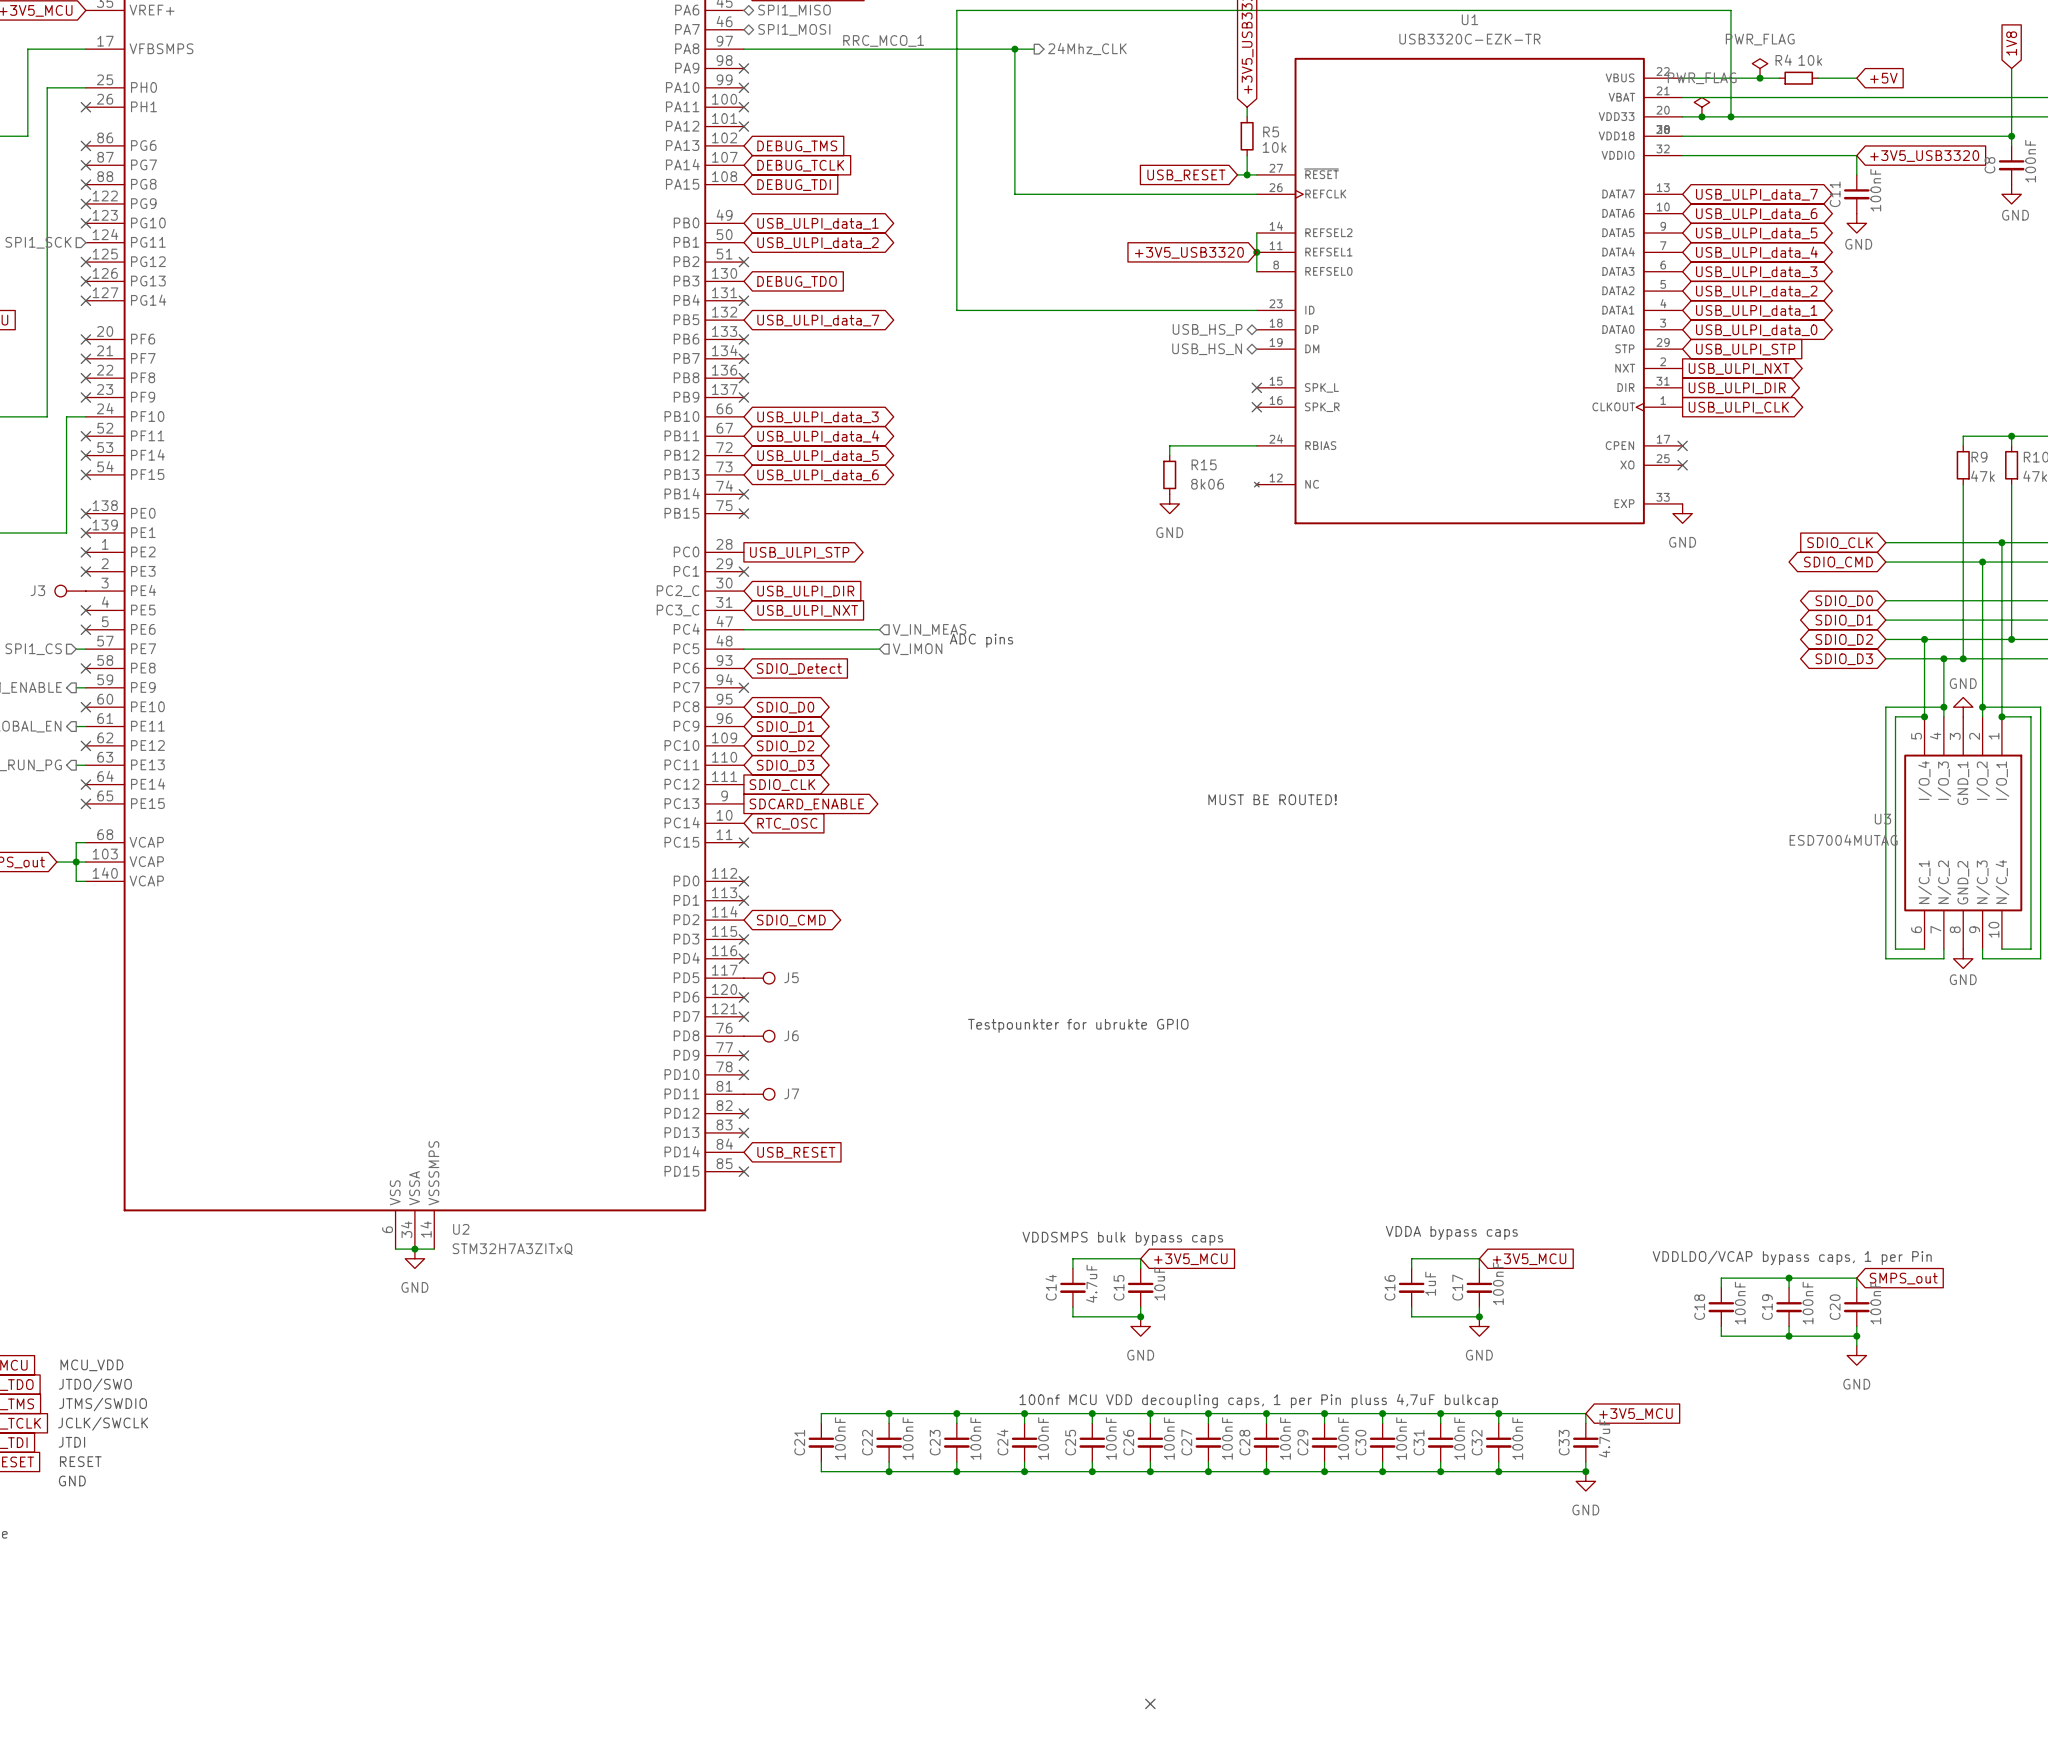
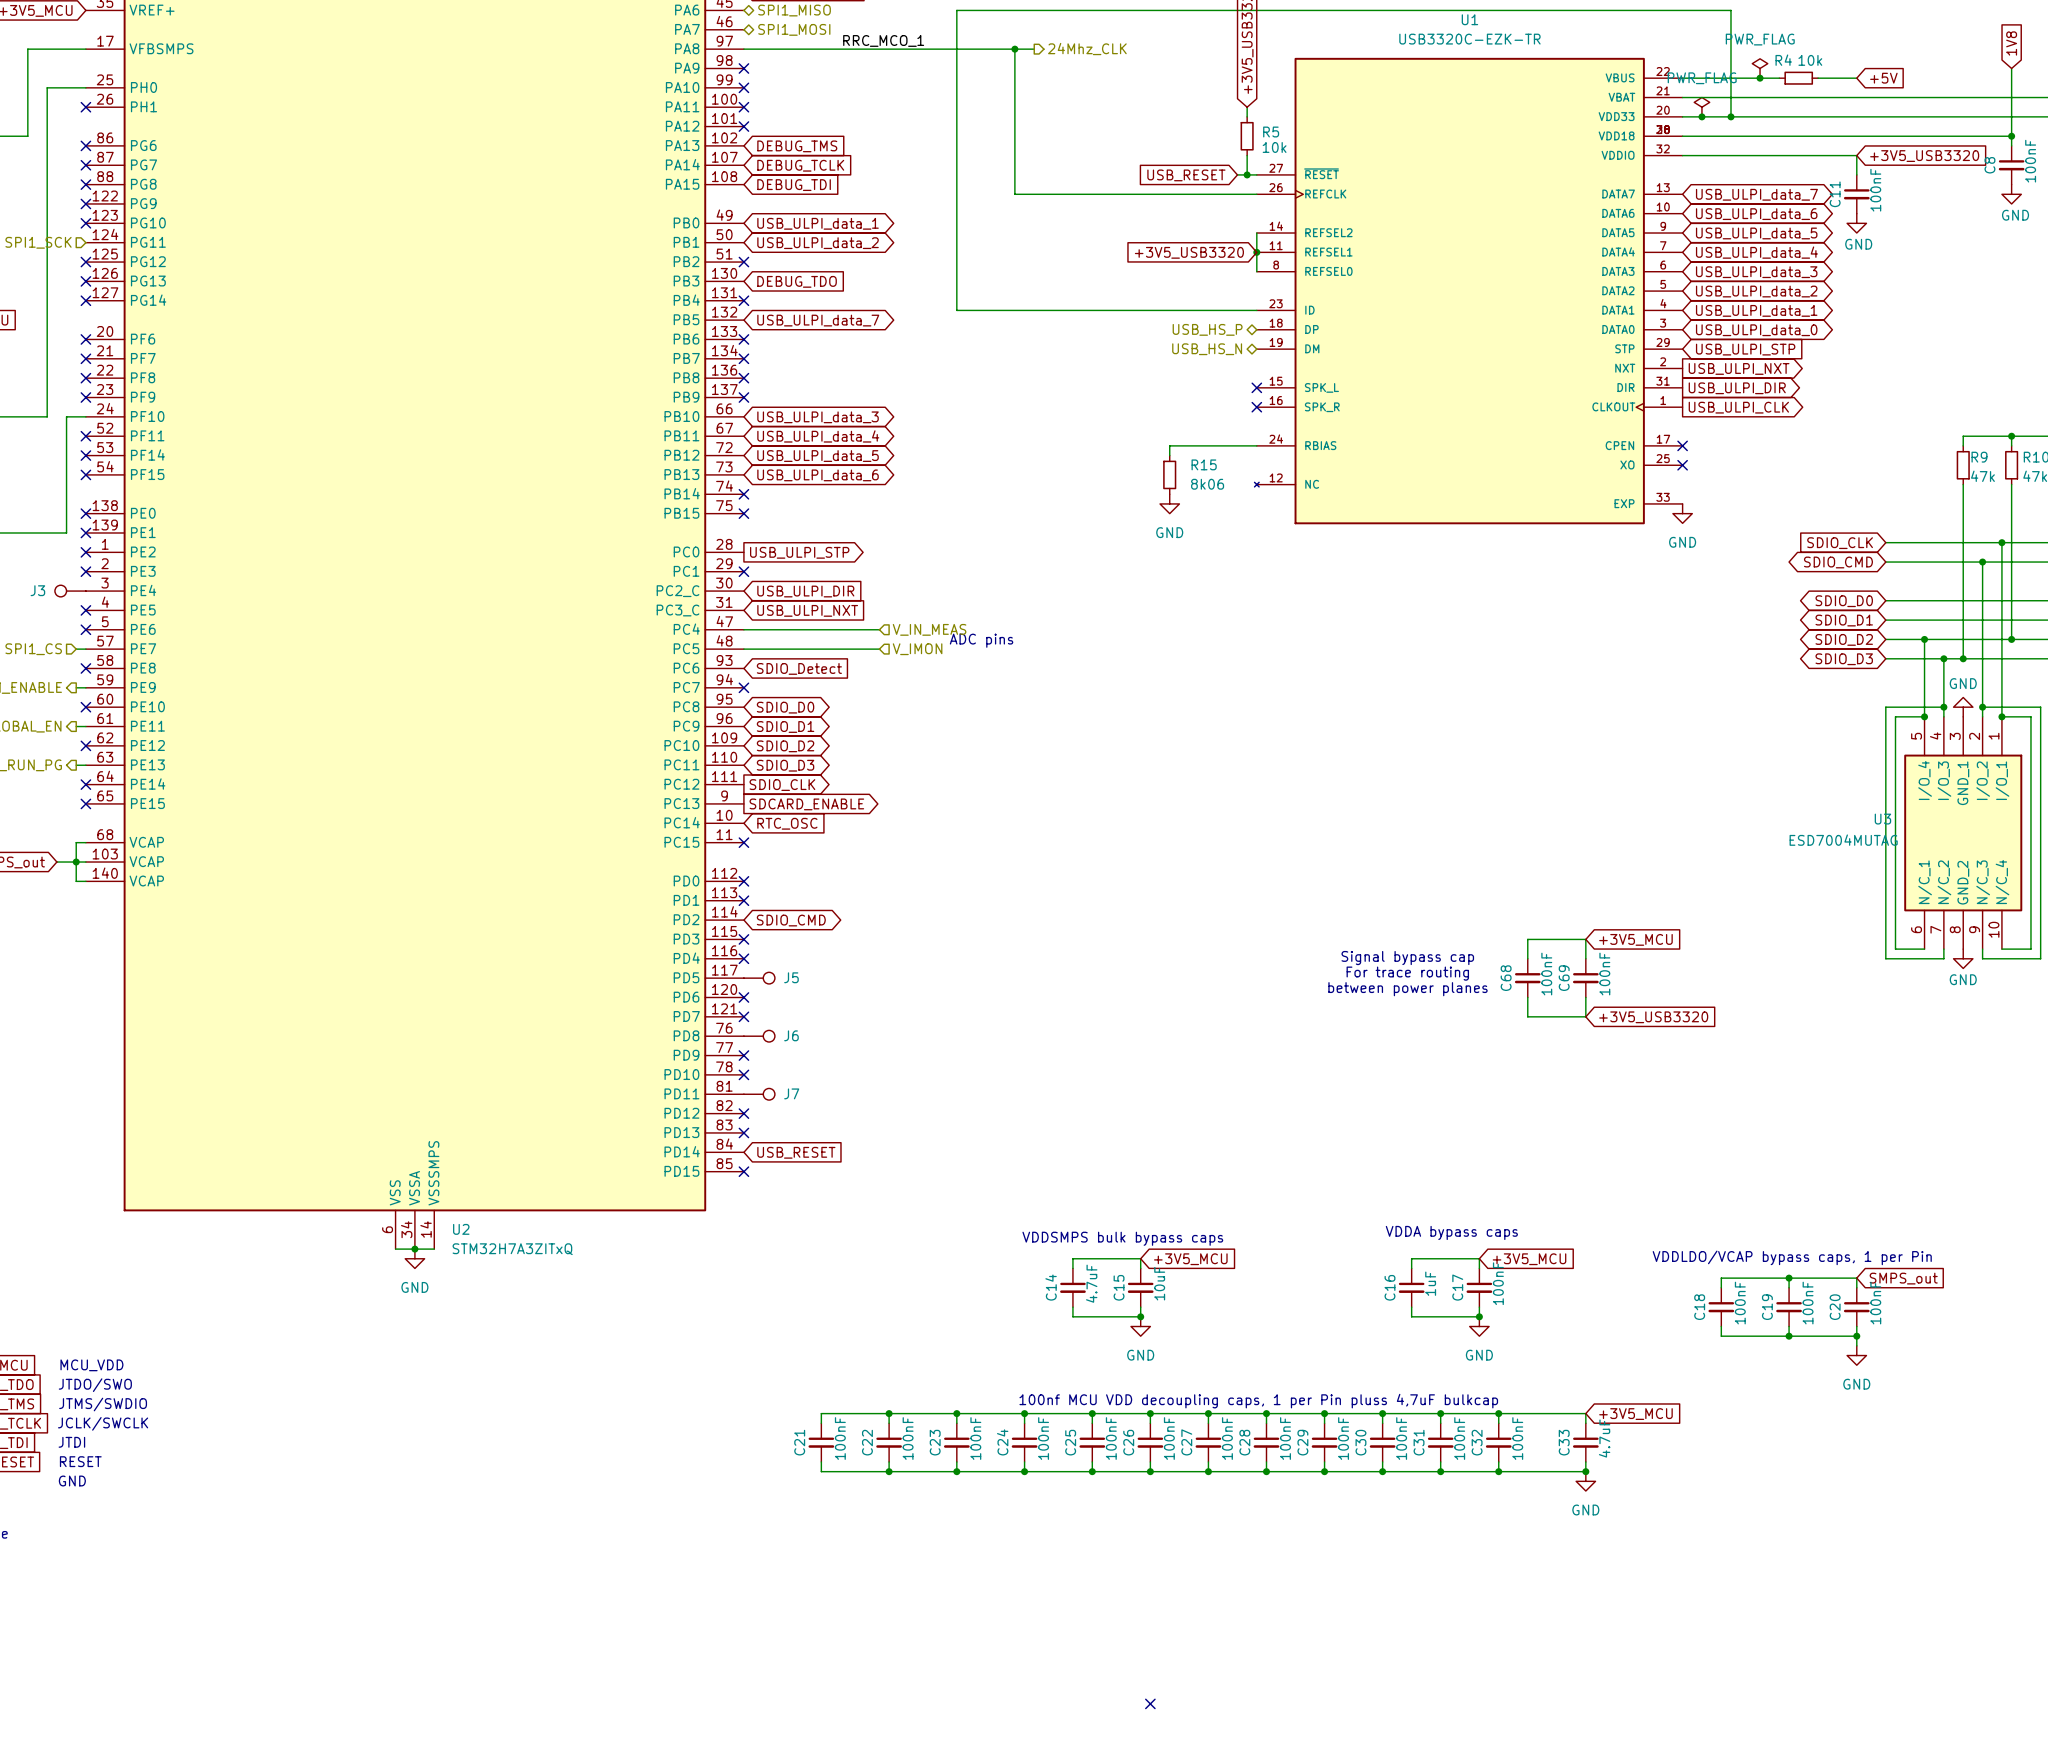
text: MUST BE ROUTED! (1272, 799) -> none
global label: none -> +3V5_MCU (1635, 939)
text: none -> Signal bypass cap (1407, 958)
wire: none -> (1527, 958) (1527, 939) (1585, 939) (1585, 958)
text: none -> For trace routing (1407, 973)
C68: none -> 100nF (1527, 978)
C69: none -> 100nF (1585, 978)
text: none -> between power planes (1408, 989)
wire: none -> (1527, 997) (1527, 1016) (1585, 1016) (1585, 997)
global label: none -> +3V5_USB3320 (1653, 1017)
text: Testpounkter for ubrukte GPIO (1078, 1025) -> none

